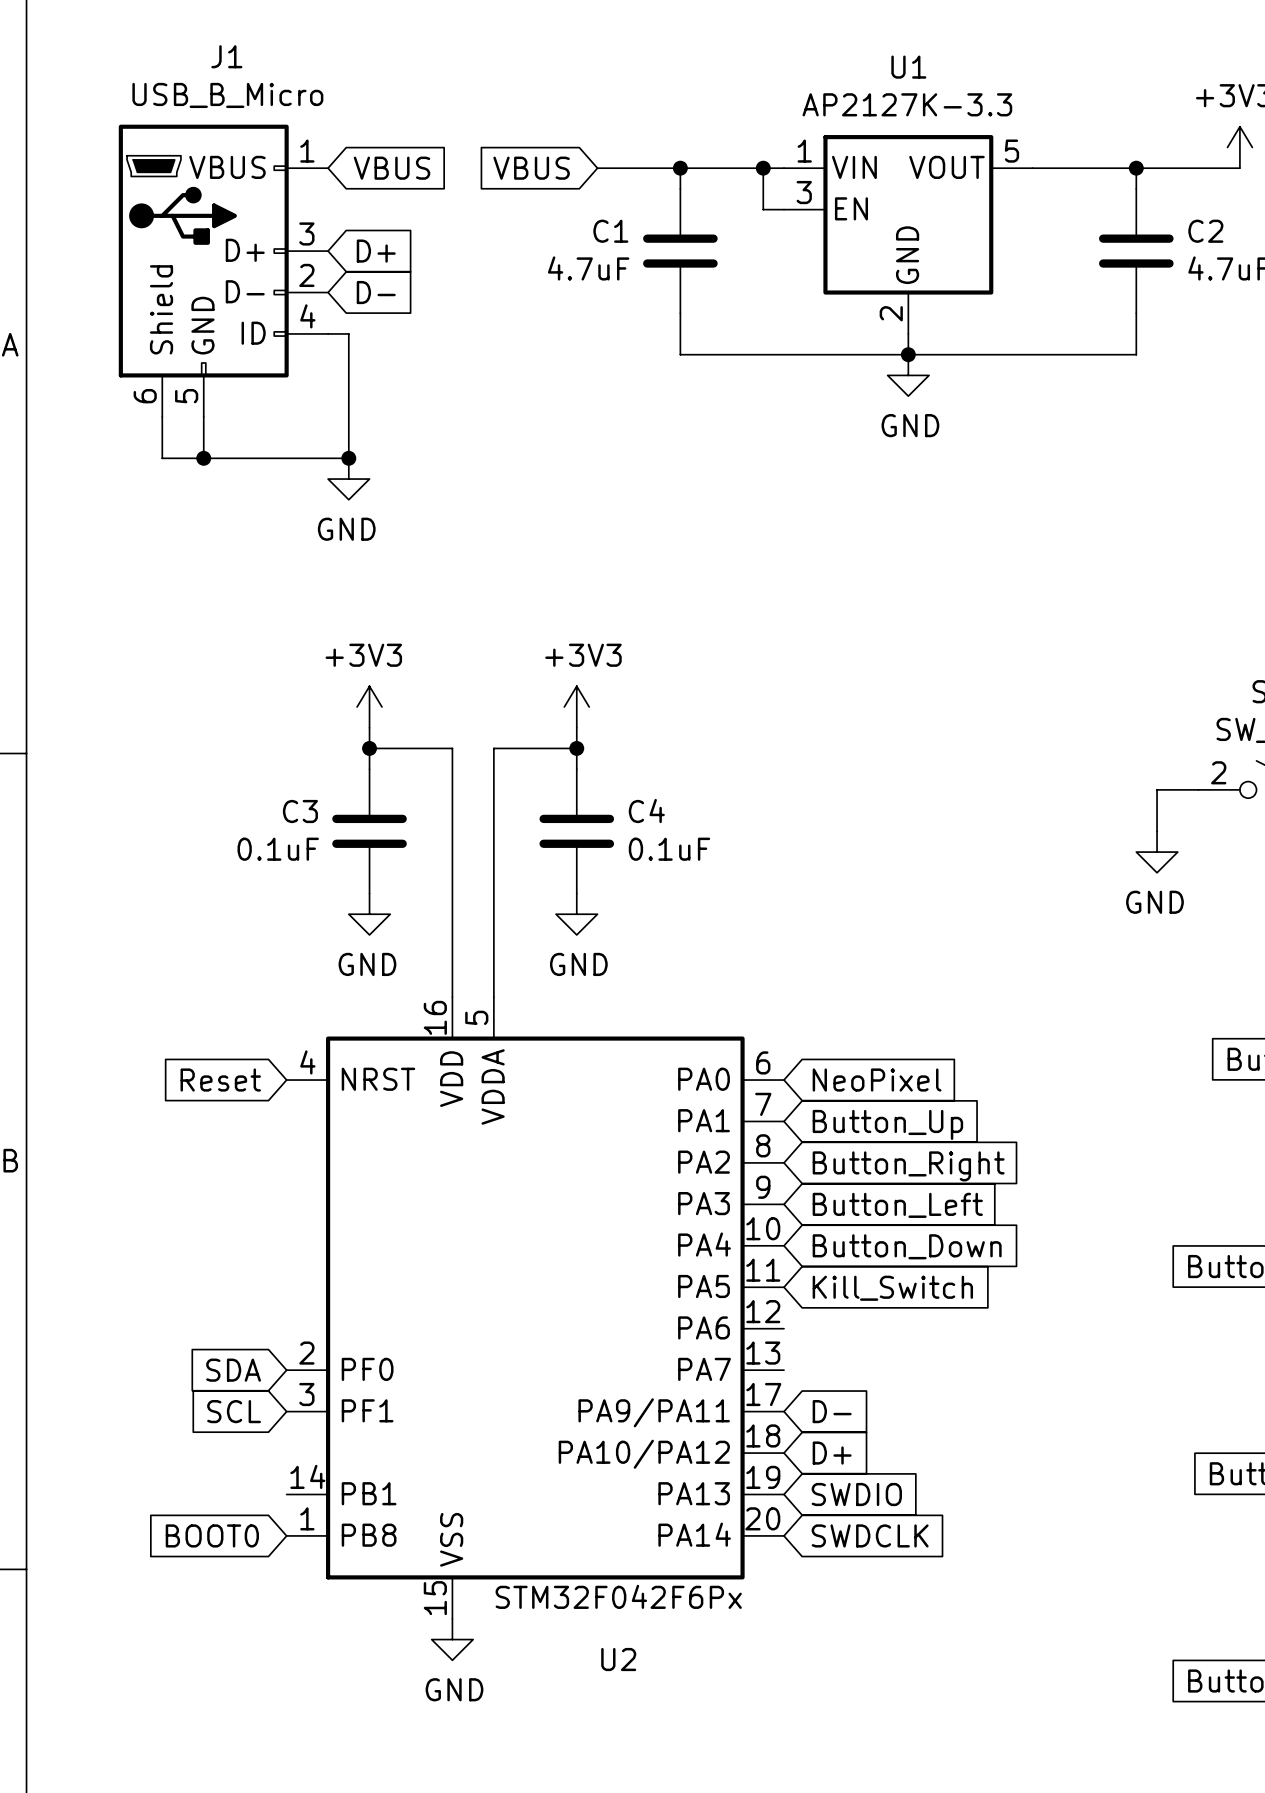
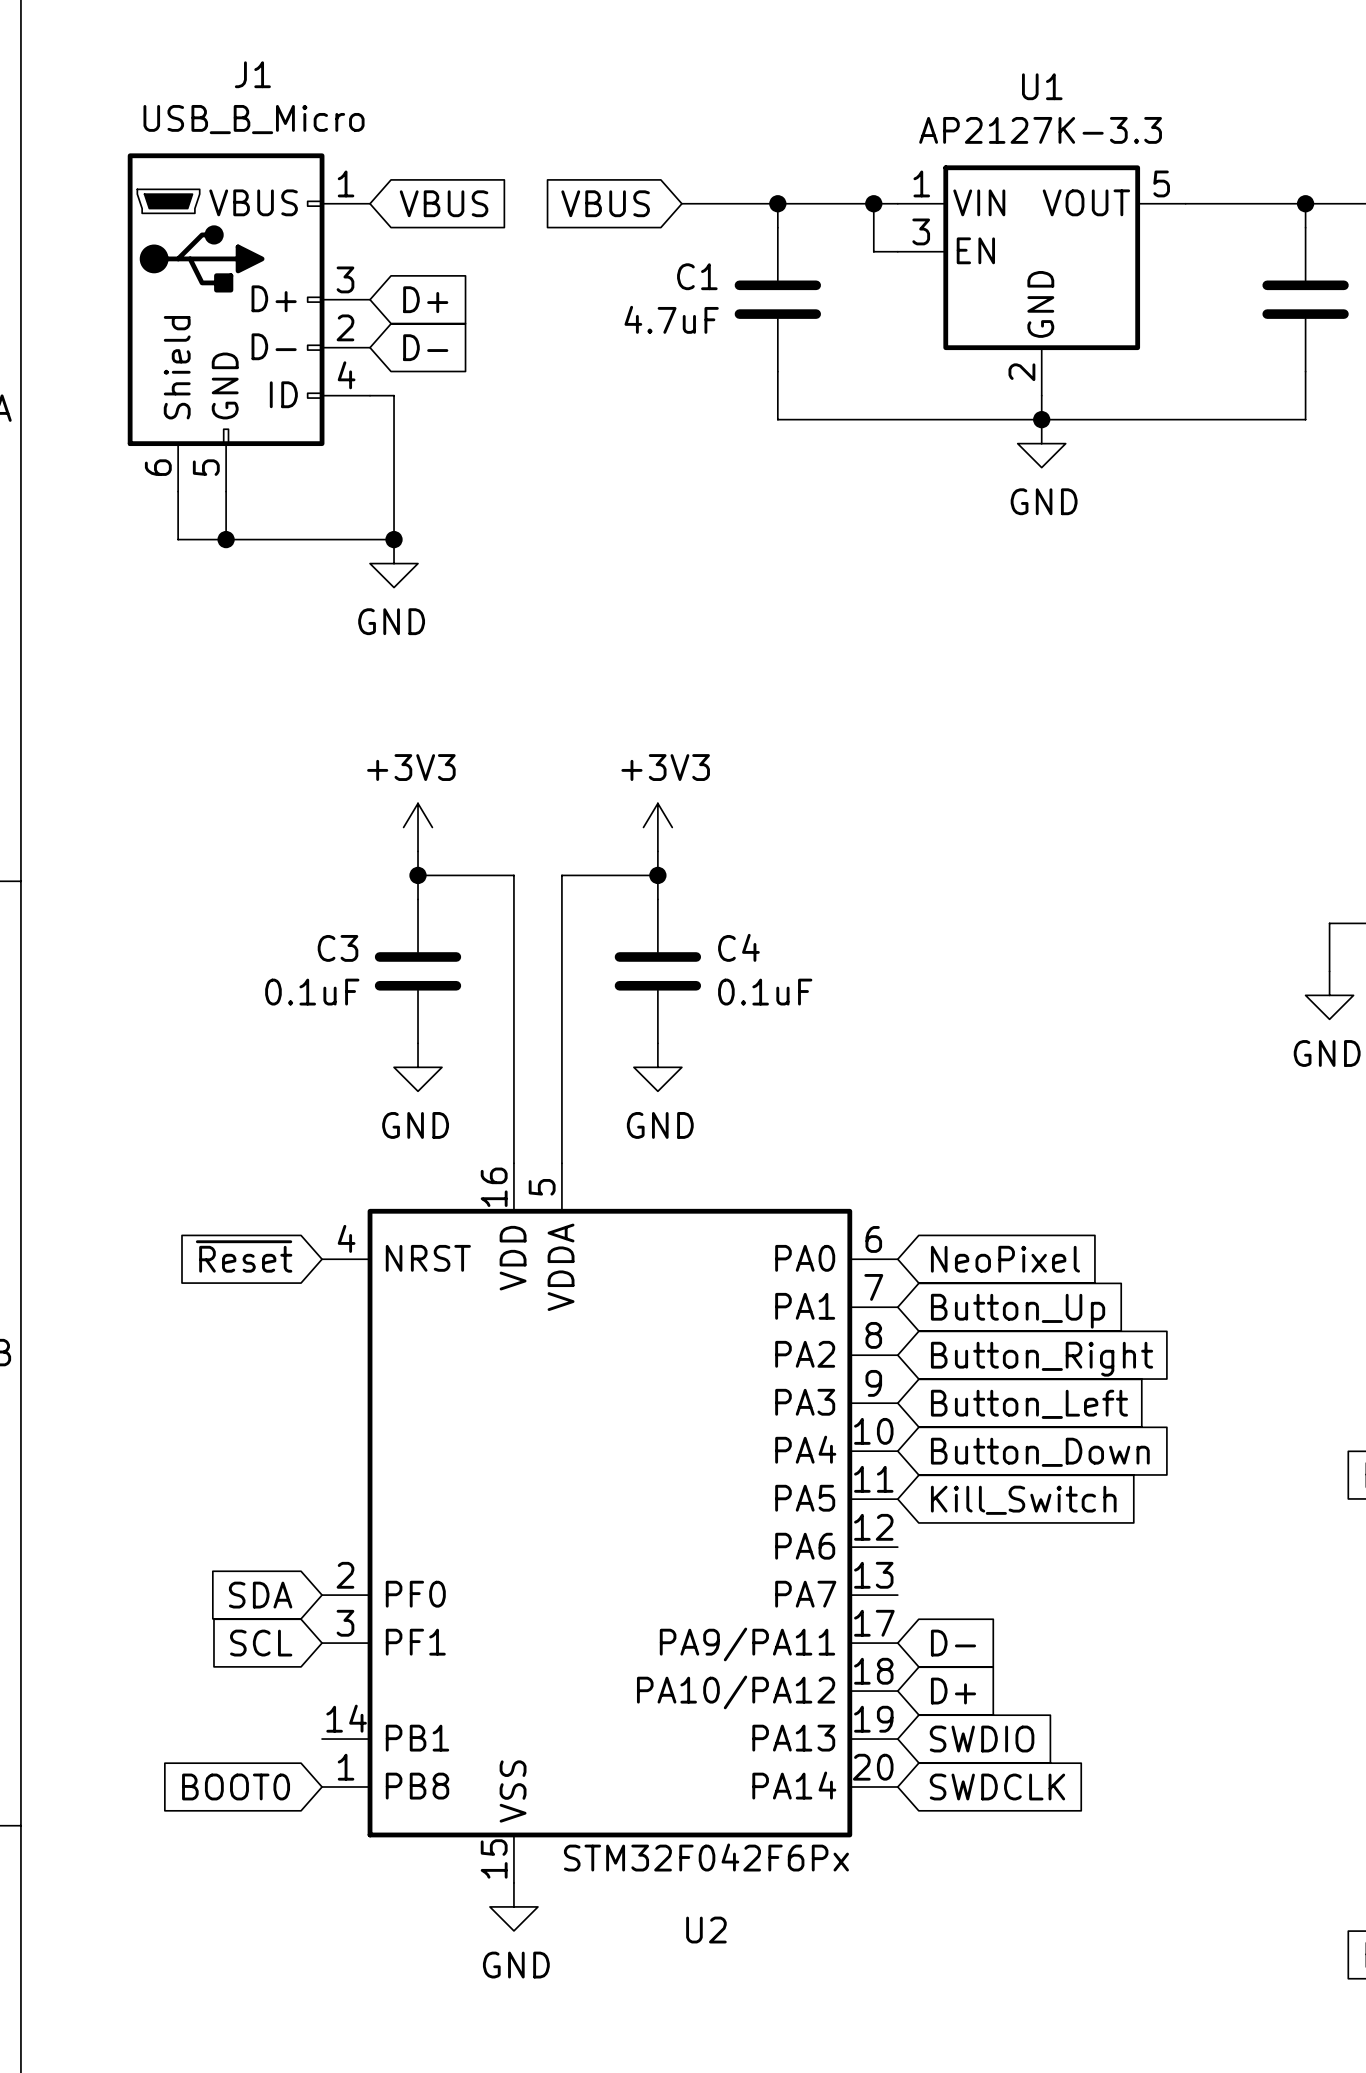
global label: Reset (220, 1080) -> ~{Reset} (244, 1256)

